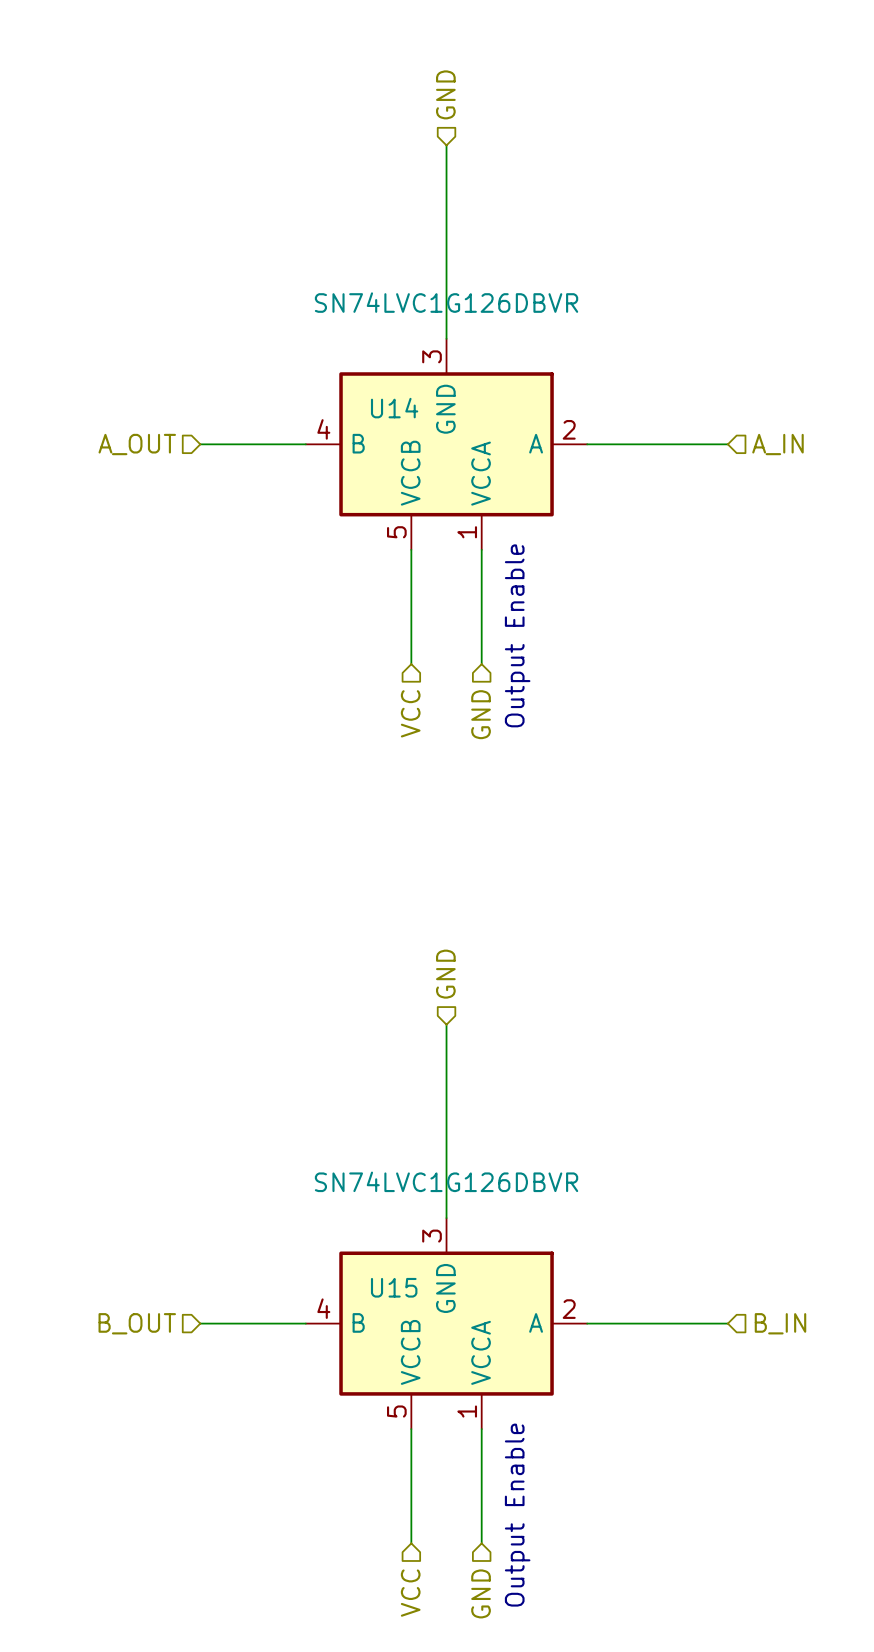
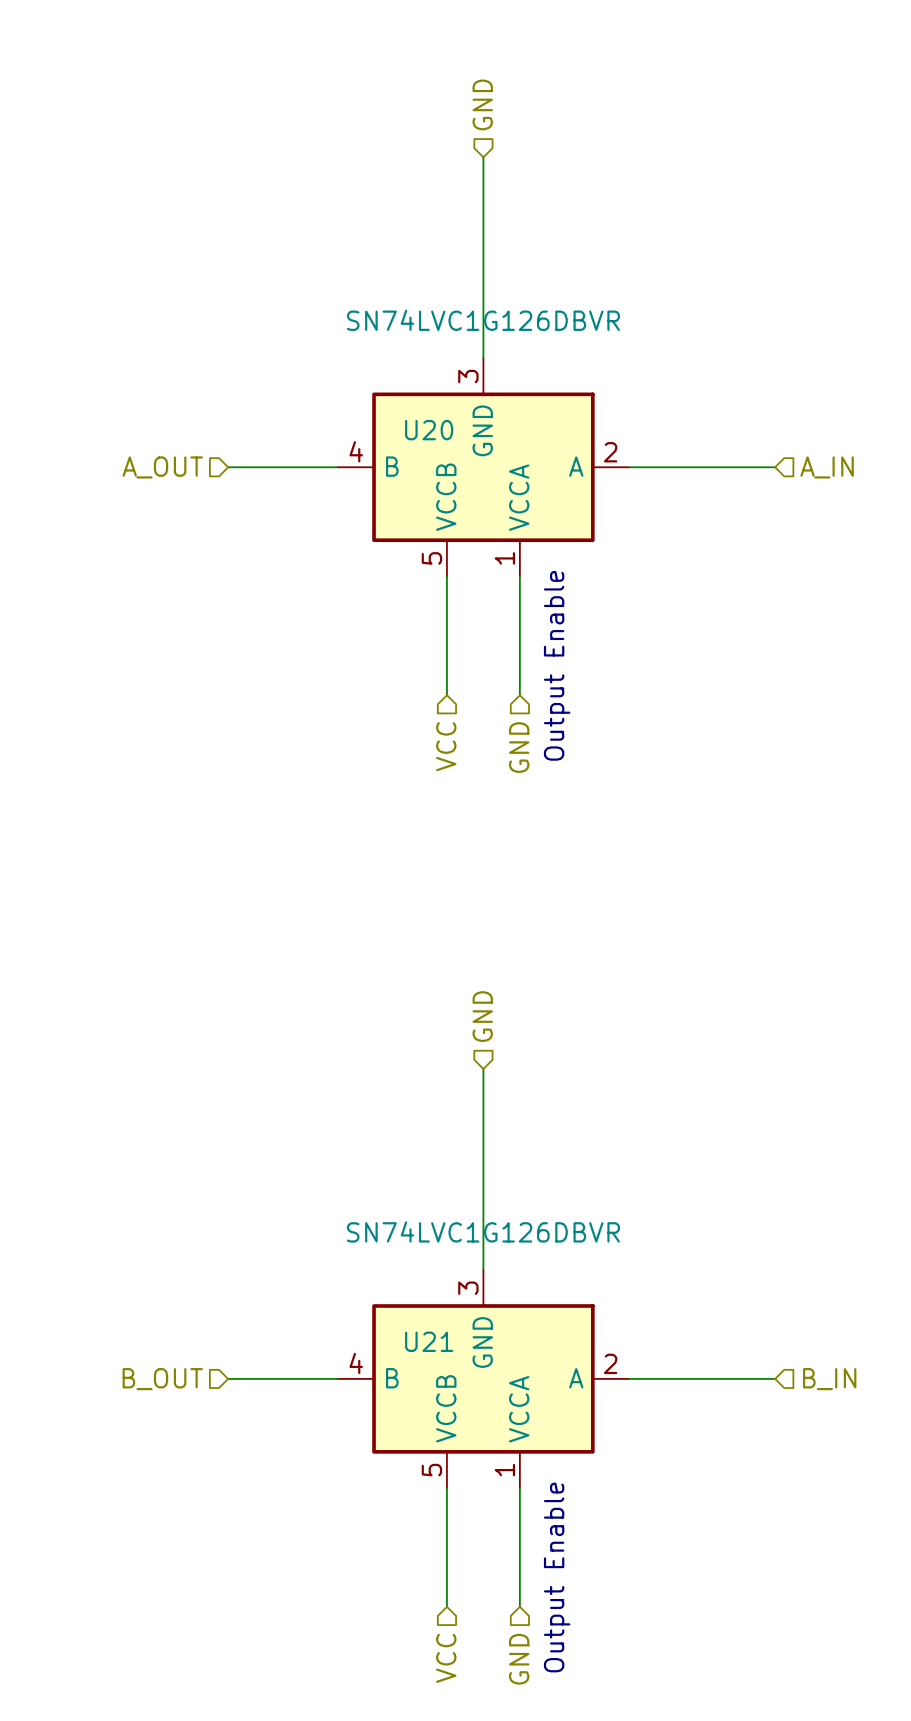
U14 name: U14 (394, 408) -> U20 (429, 430)
U15 name: U15 (394, 1287) -> U21 (429, 1341)

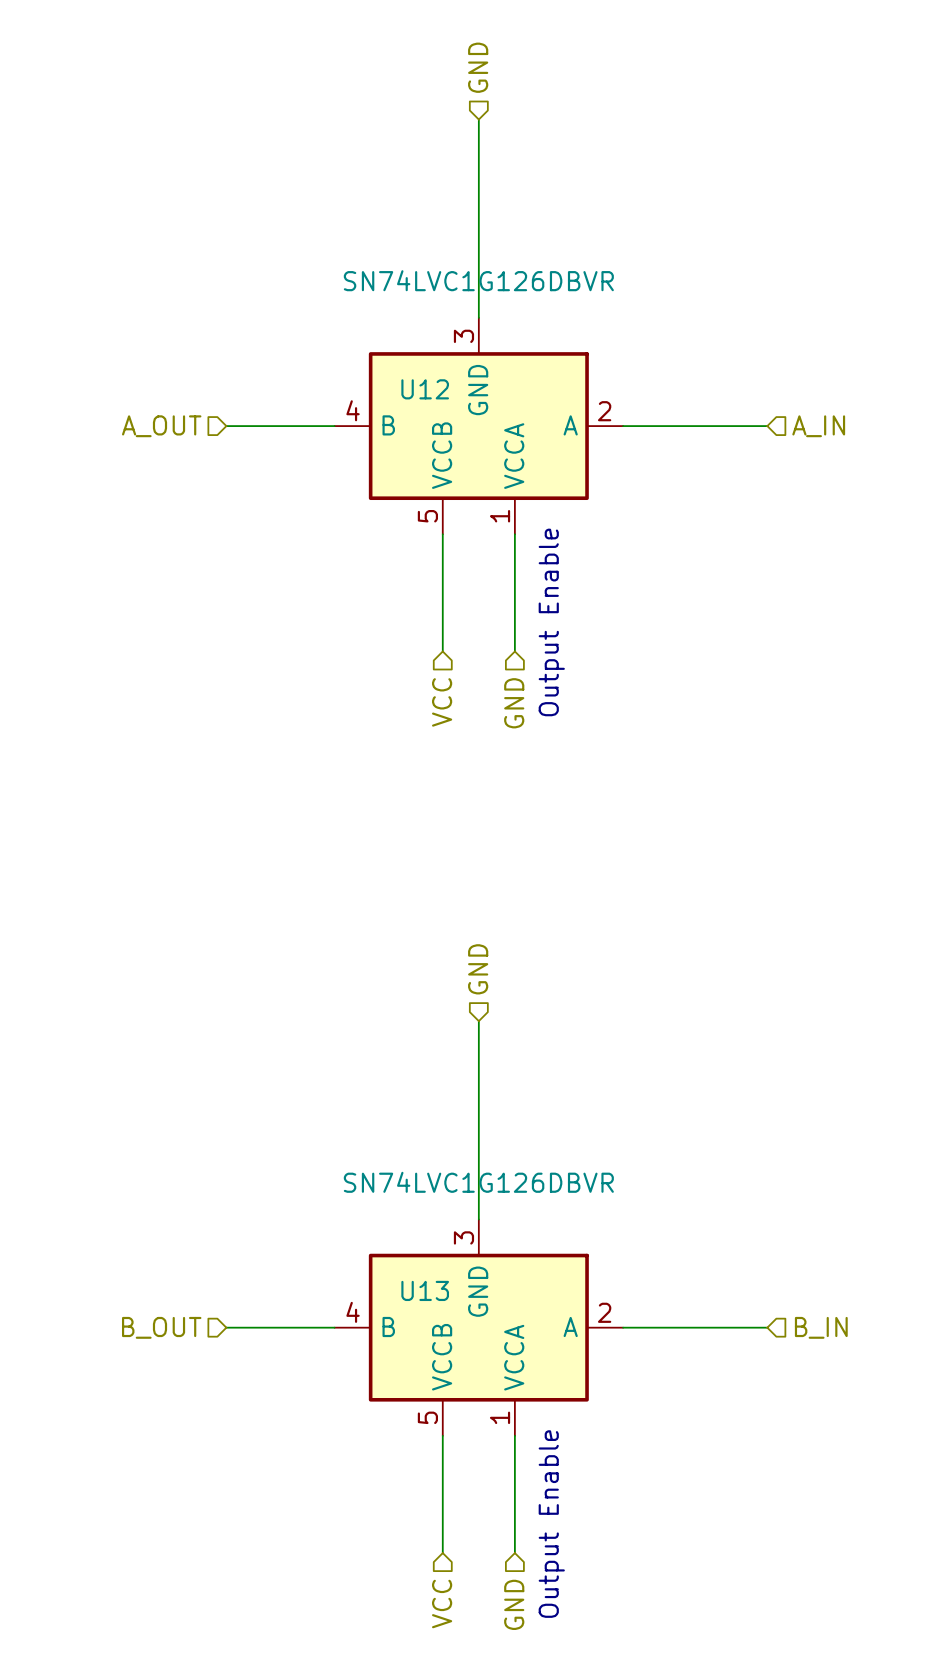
U20 name: U20 (429, 430) -> U12 (425, 389)
U21 name: U21 (429, 1341) -> U13 (425, 1290)

